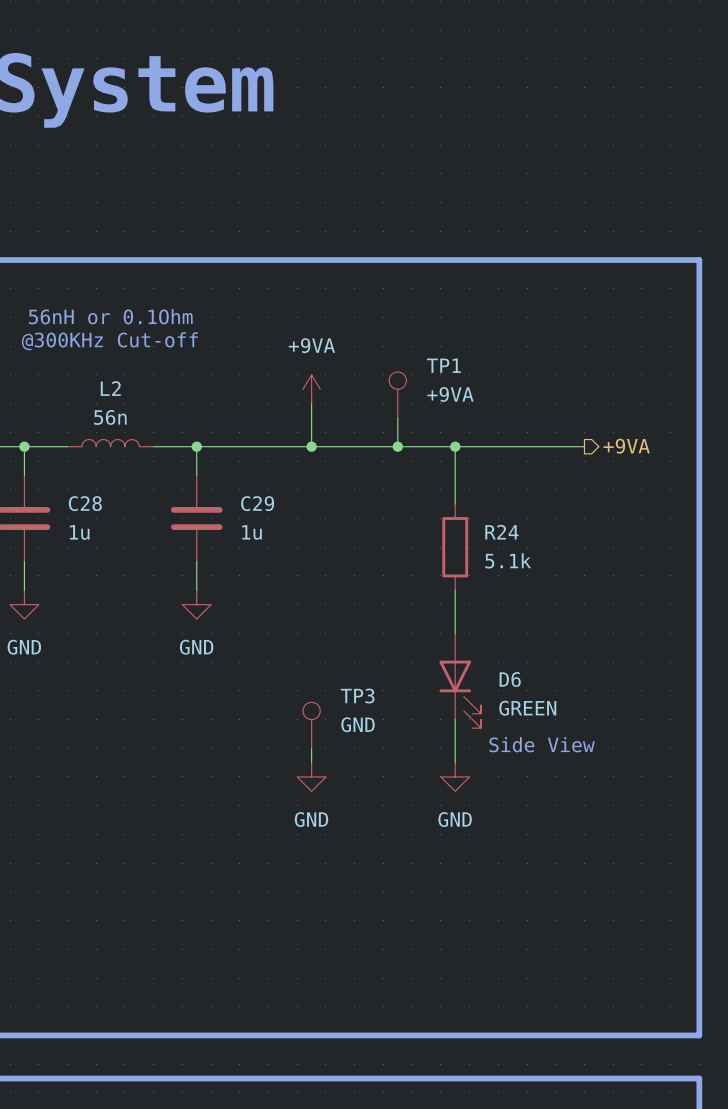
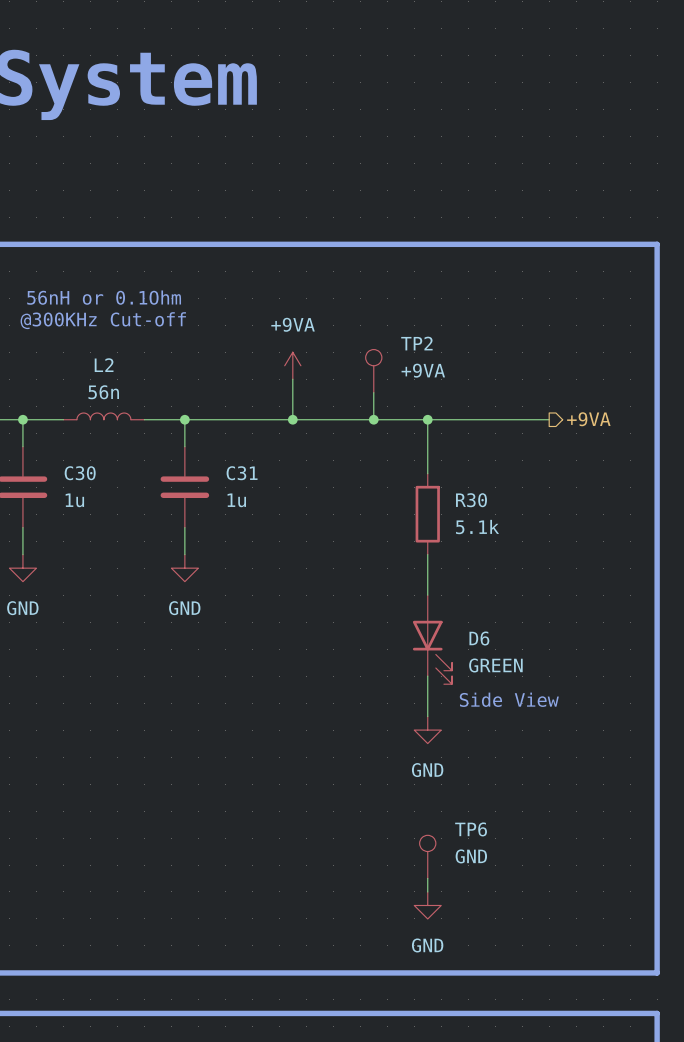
TP1 name: TP1 (443, 365) -> TP2 (416, 343)
C28 name: C28 (85, 503) -> C30 (80, 473)
C29 name: C29 (257, 503) -> C31 (242, 473)
R24 name: R24 (501, 532) -> R30 (471, 500)
TP3: GND (311, 725) -> none
wire: (311, 748) (311, 762) -> (427, 878) (427, 891)
power symbol position: GND (311, 776) -> GND (427, 905)
TP6: none -> GND (427, 856)

